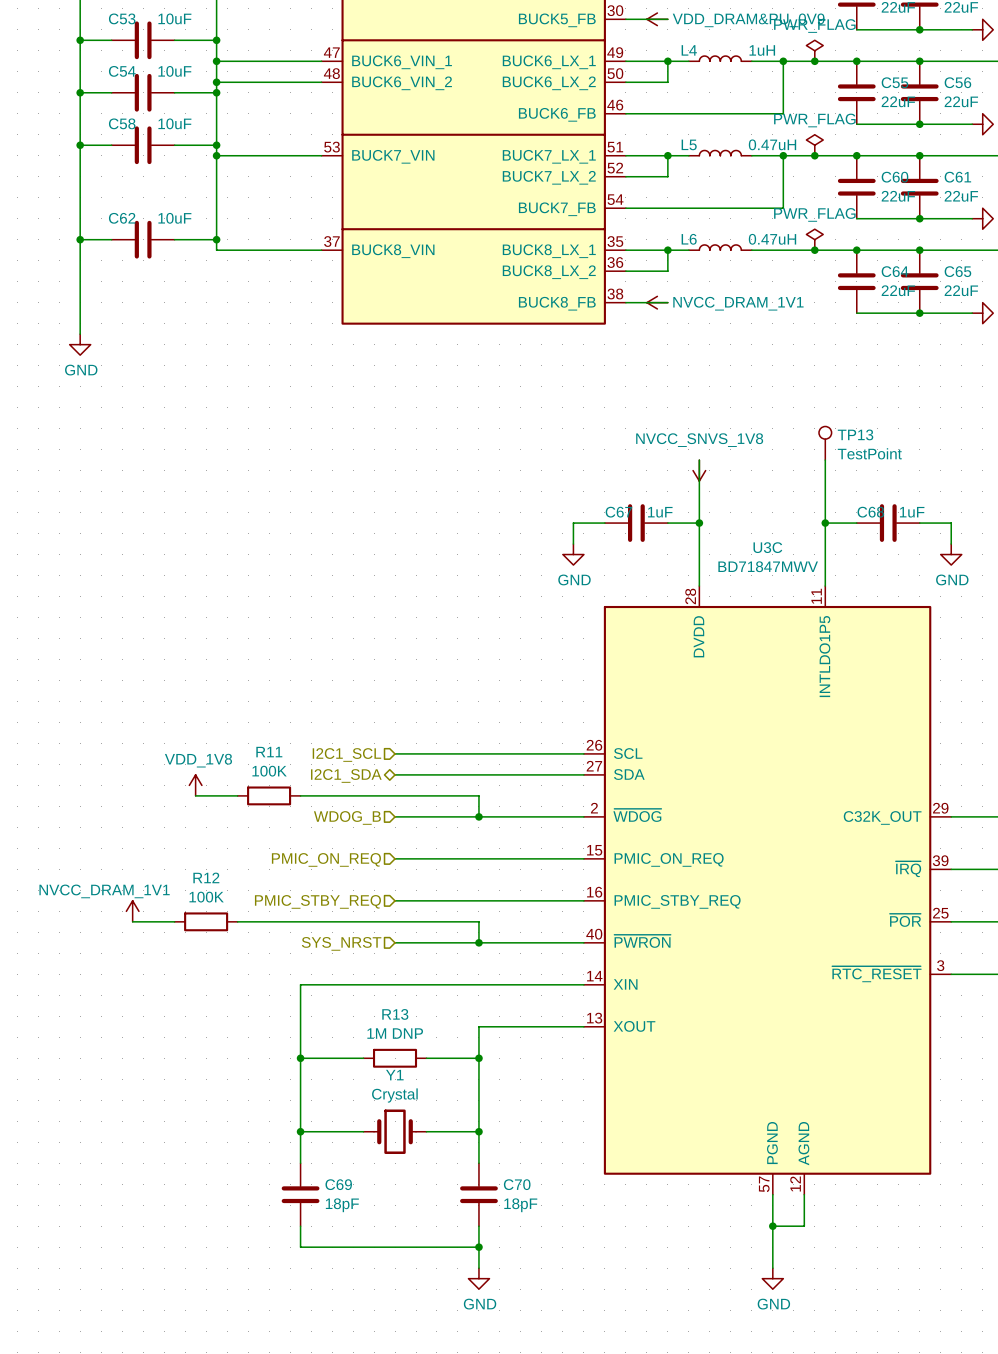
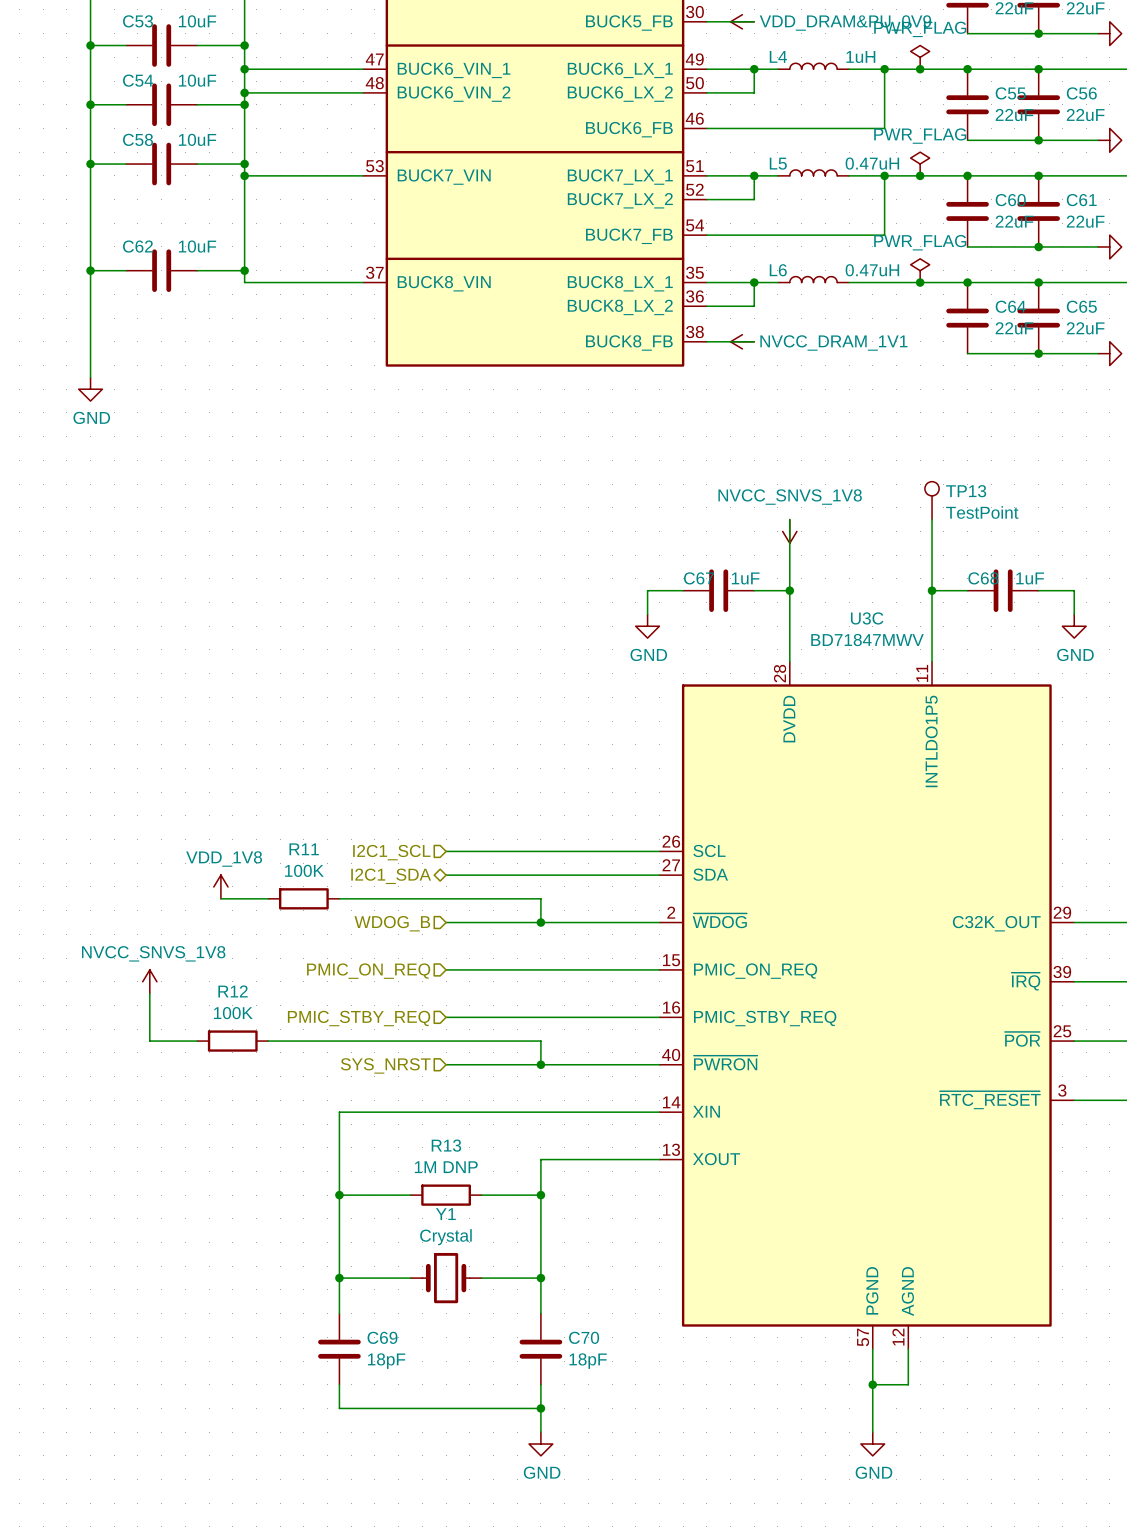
power symbol: none -> NVCC_SNVS_1V8 (149, 981)
power symbol: NVCC_DRAM_1V1 (132, 911) -> none

